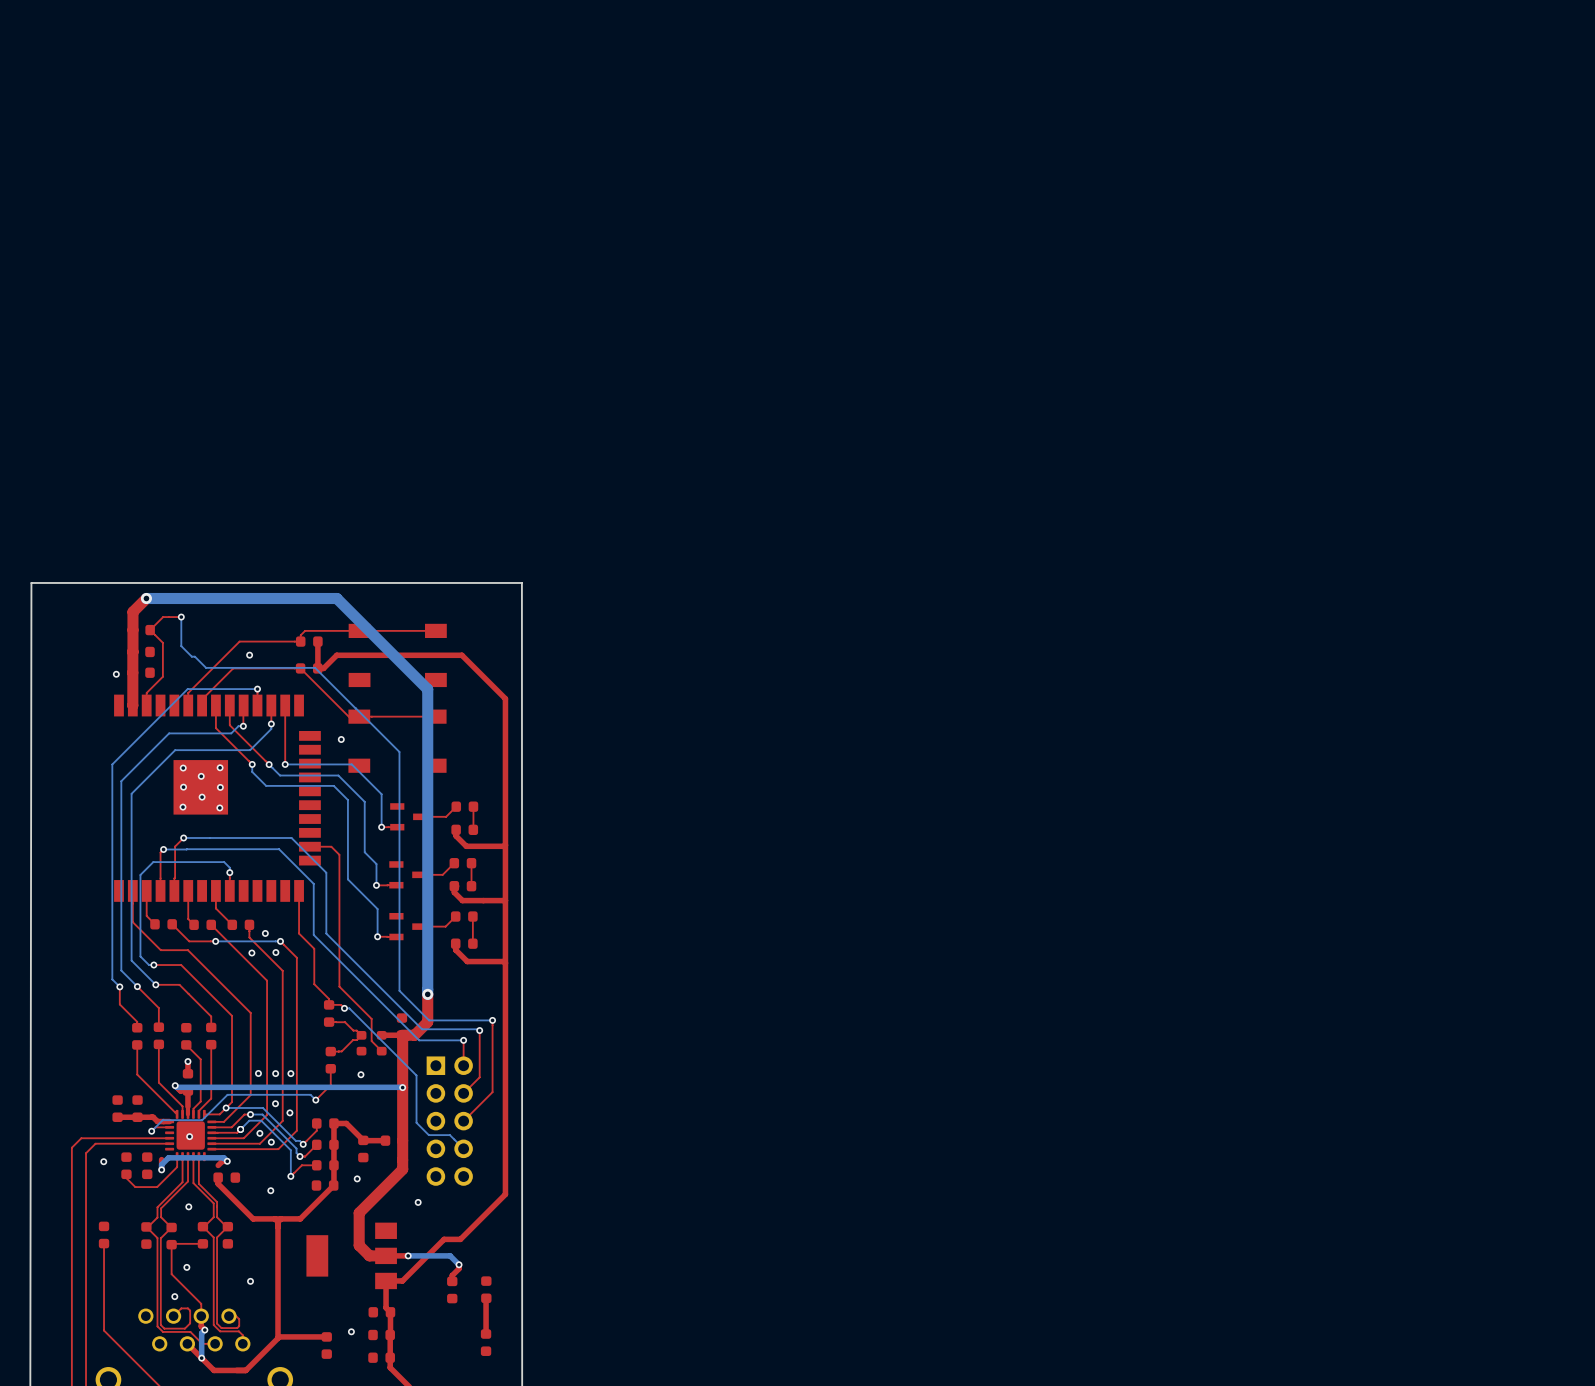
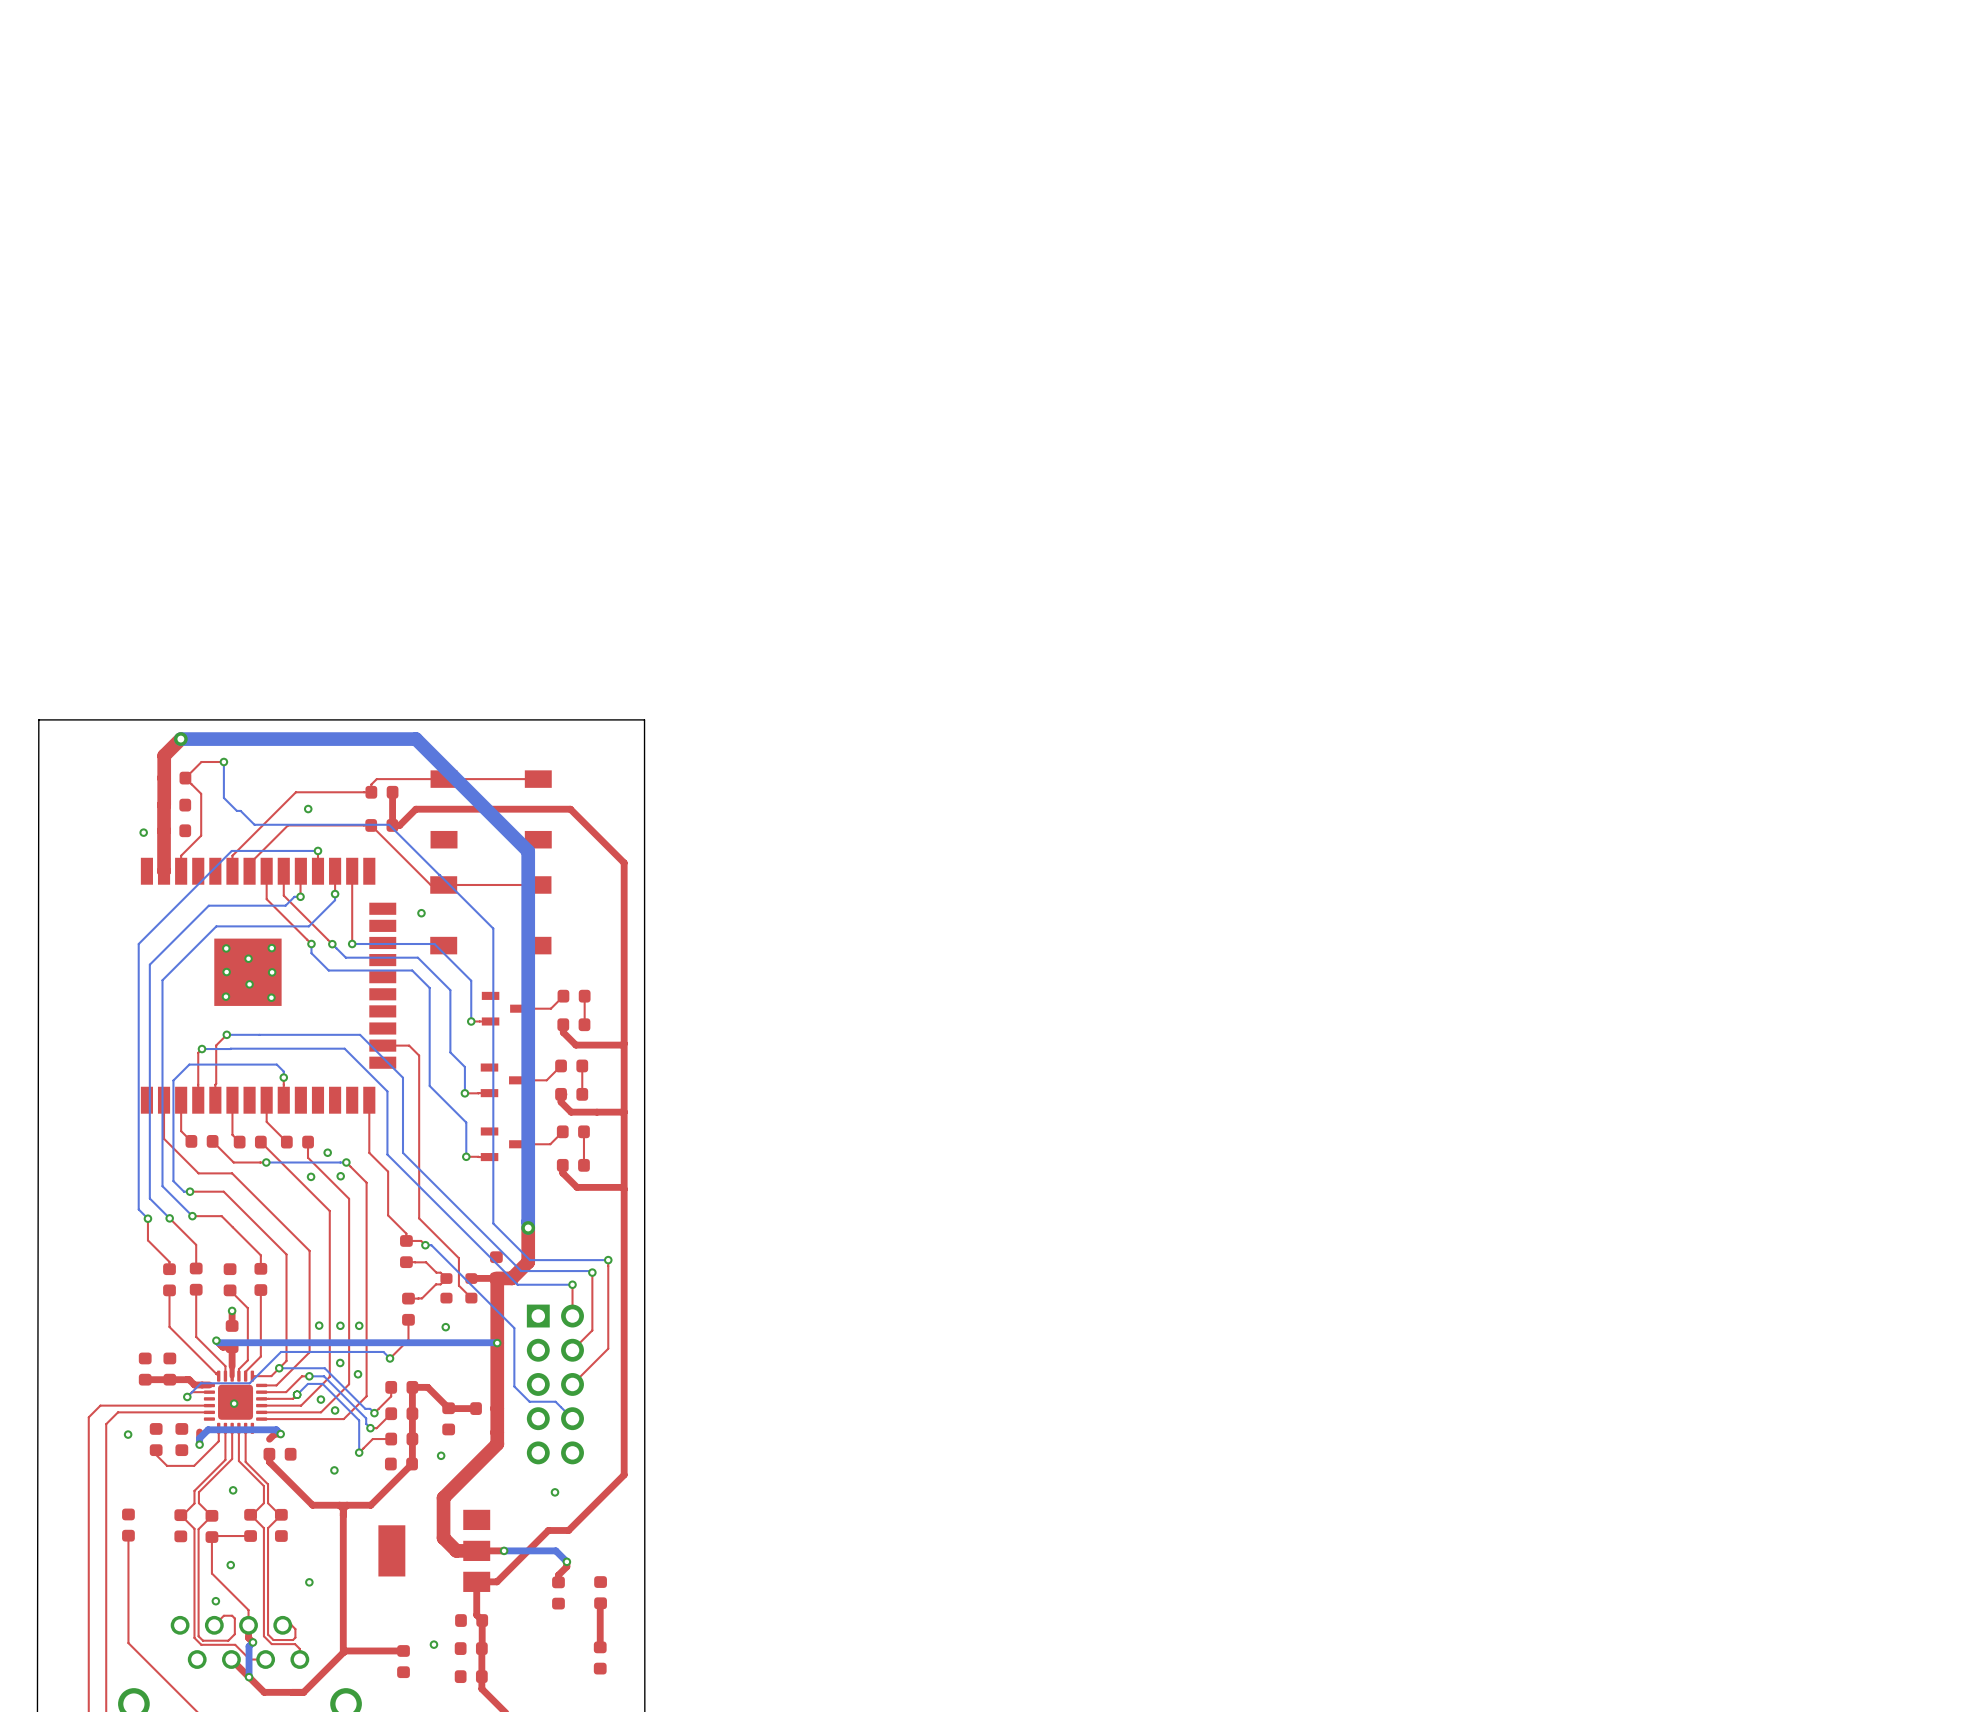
via position: (418, 1202) -> (555, 1492)

